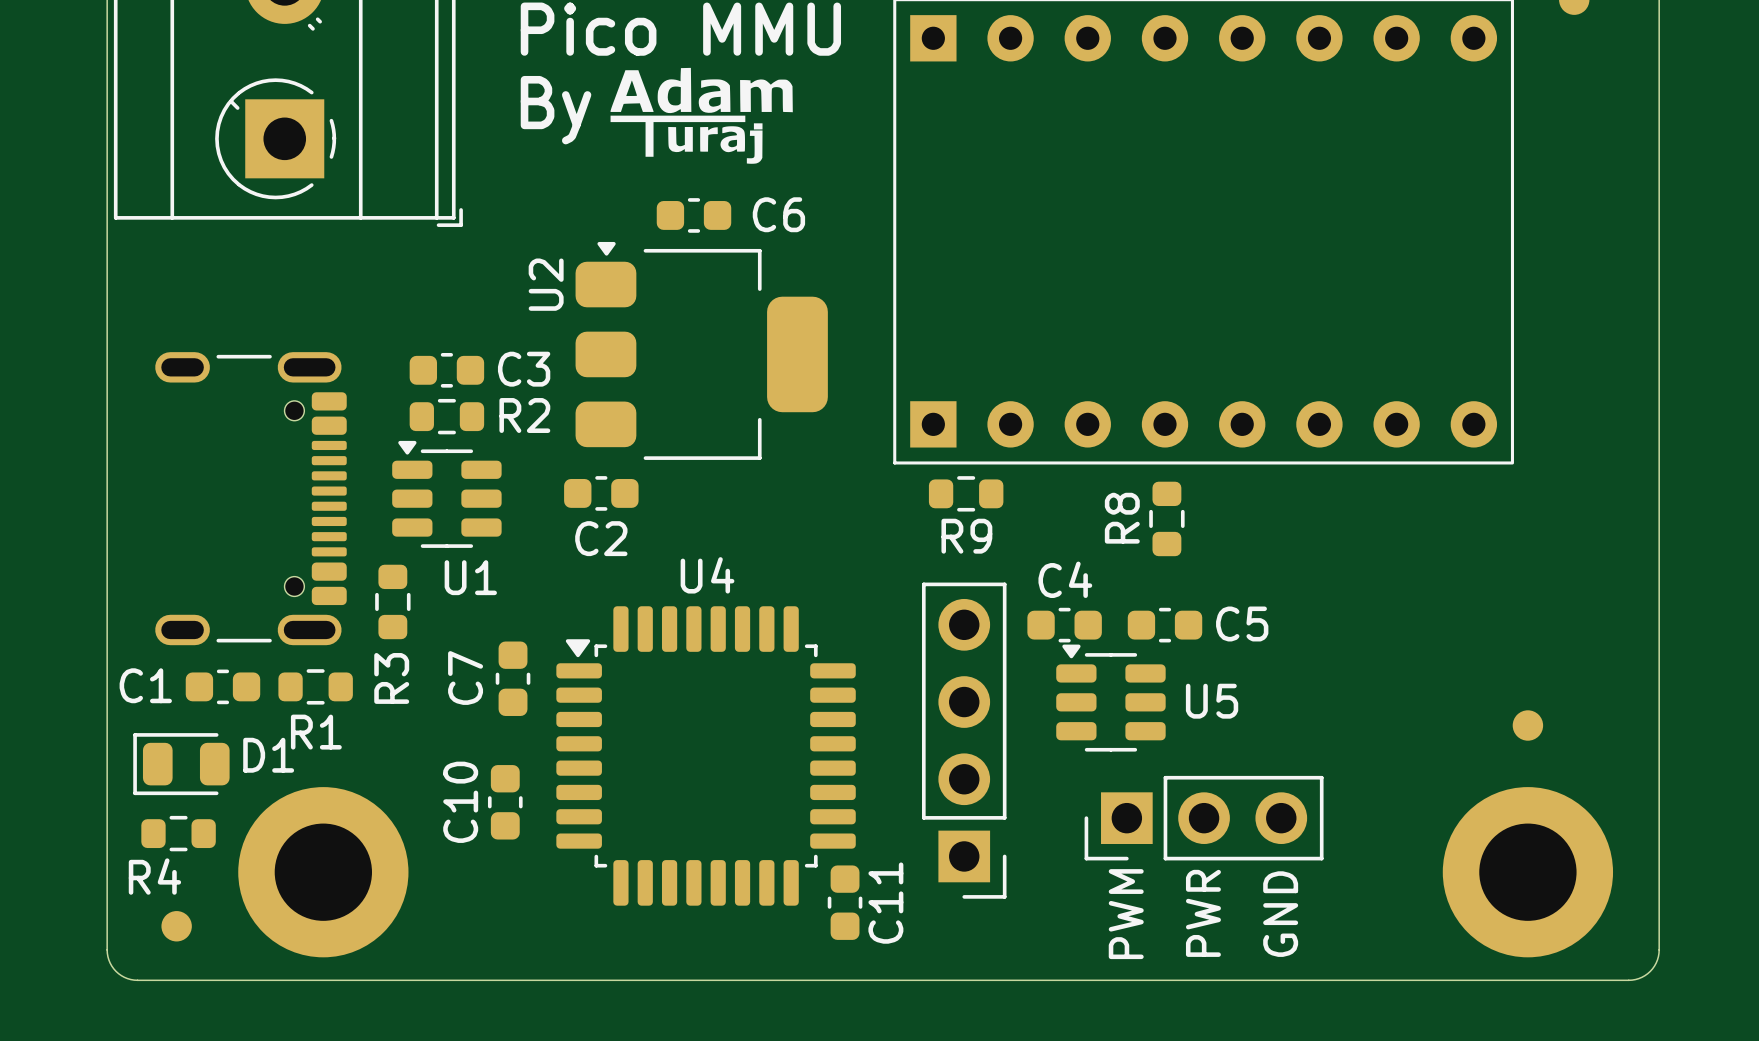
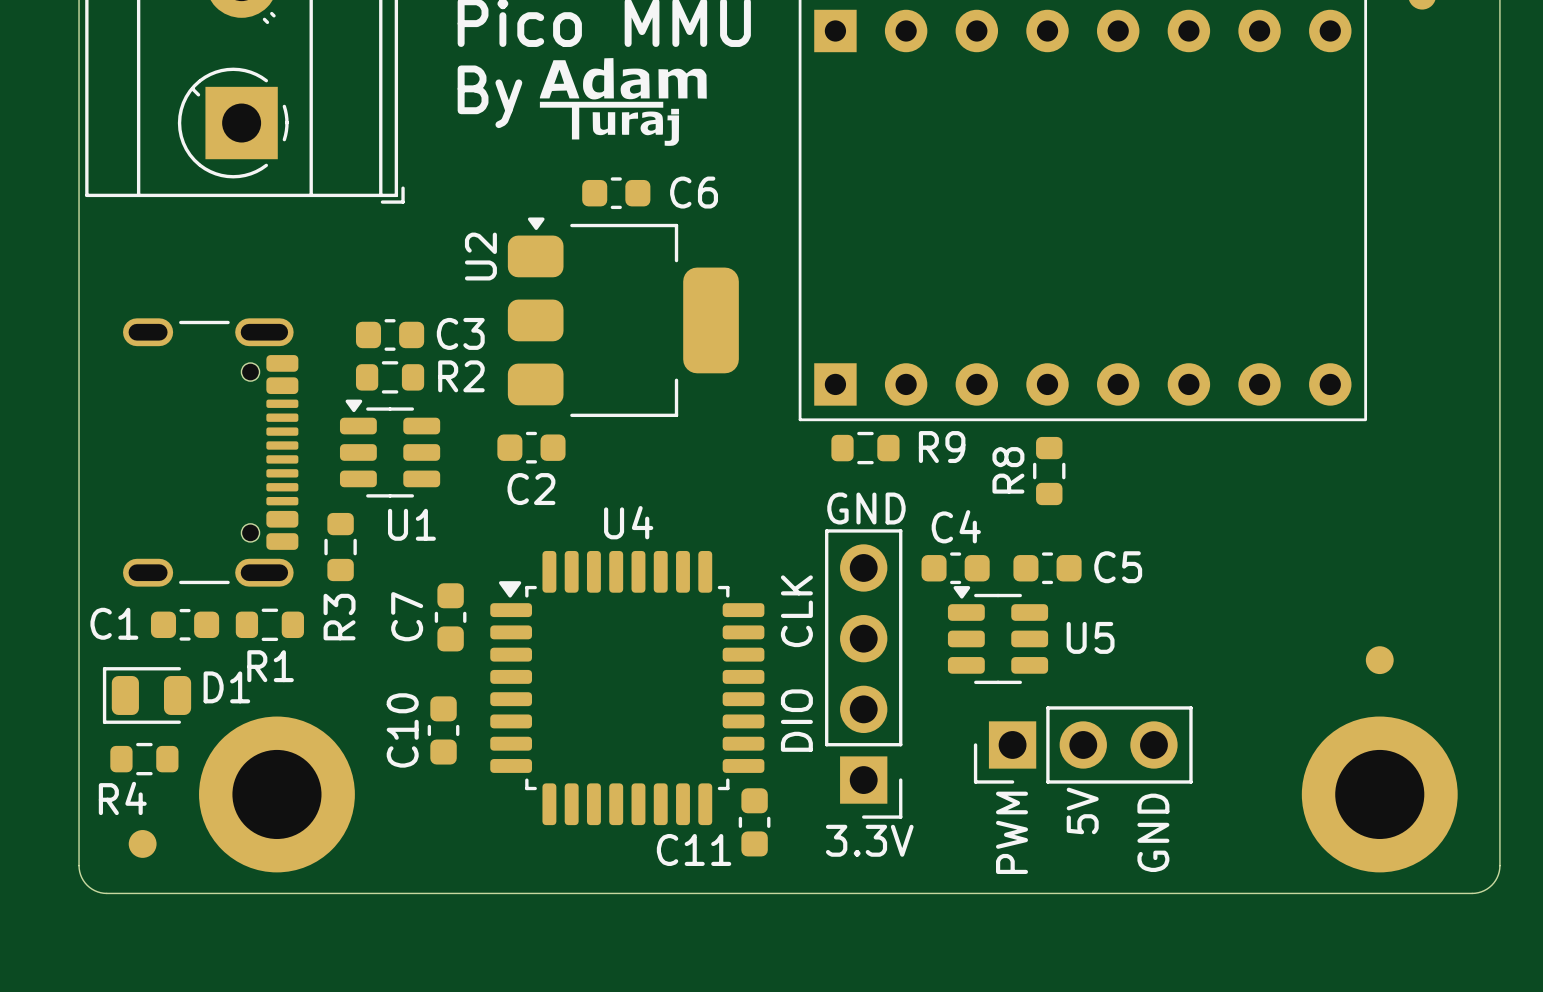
R9 name position: R9 (966, 536) -> R9 (942, 447)
text: none -> GND (866, 508)
text: none -> CLK (796, 611)
text: none -> DIO (796, 720)
text: none -> 5V (1082, 810)
C11 name rotation: 0° (885, 903) -> 90° clockwise (694, 849)
C11 name position: C11 (885, 903) -> C11 (694, 849)
text: PWR (1203, 913) -> none
text: none -> 3.3V (869, 840)

